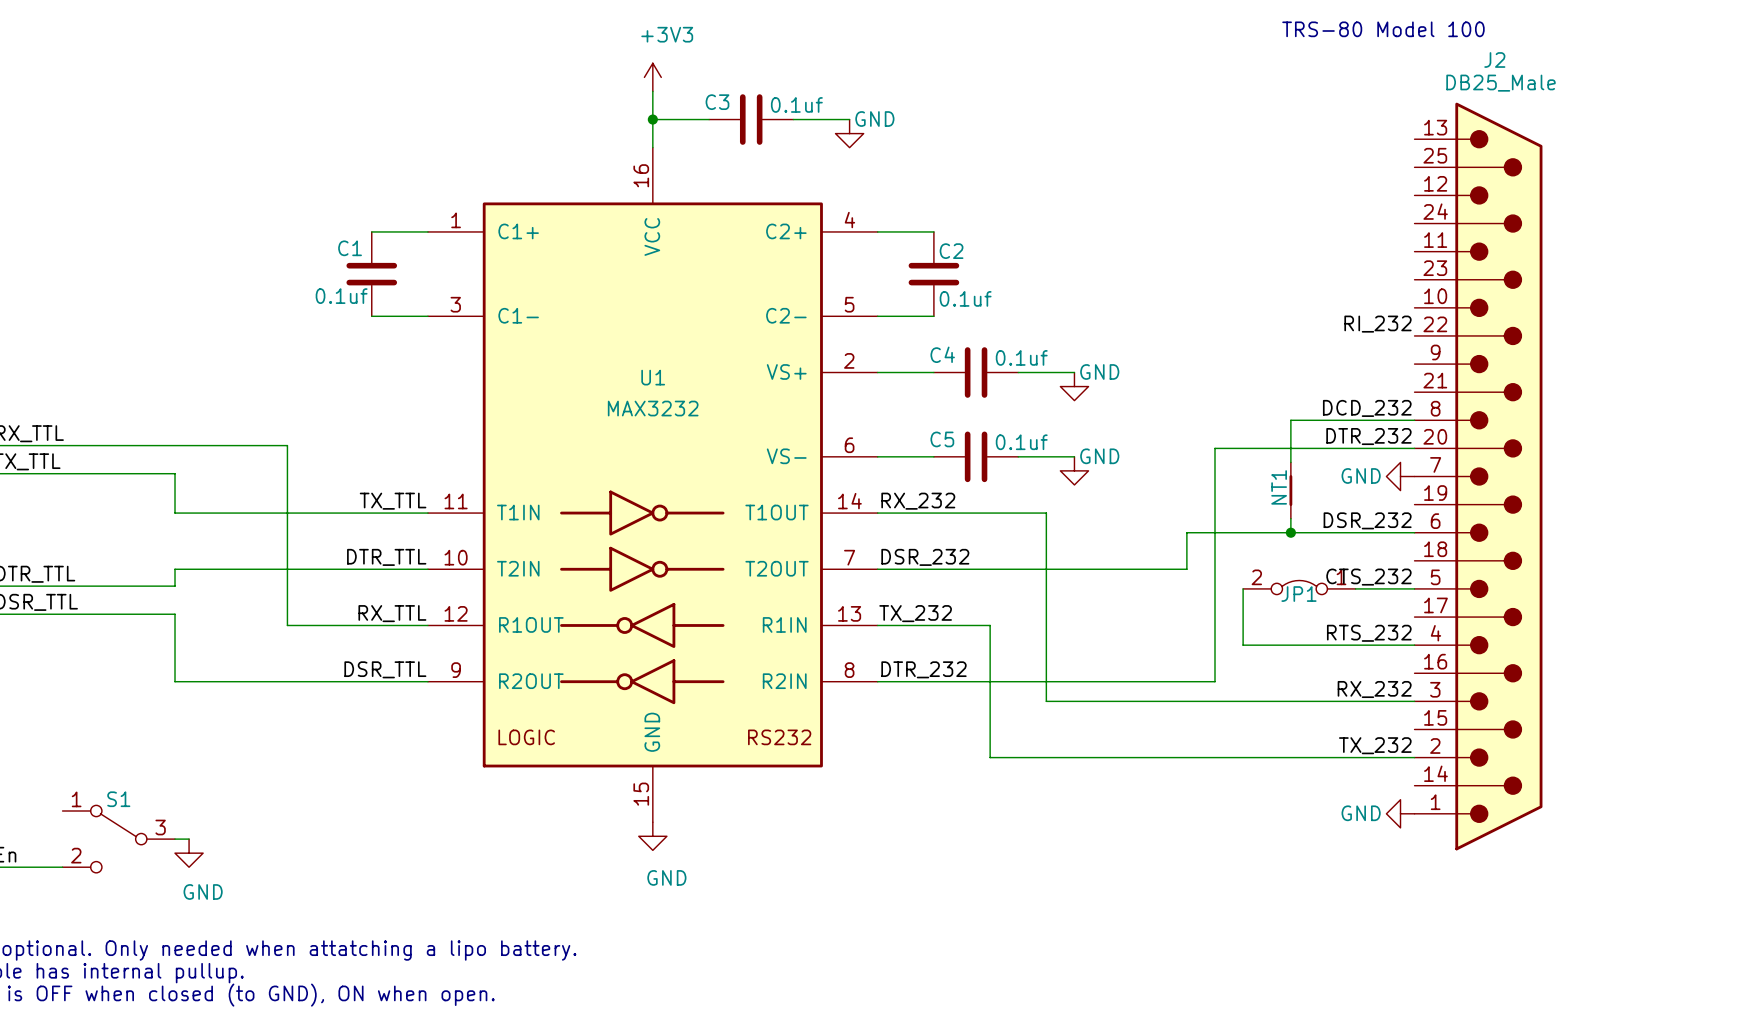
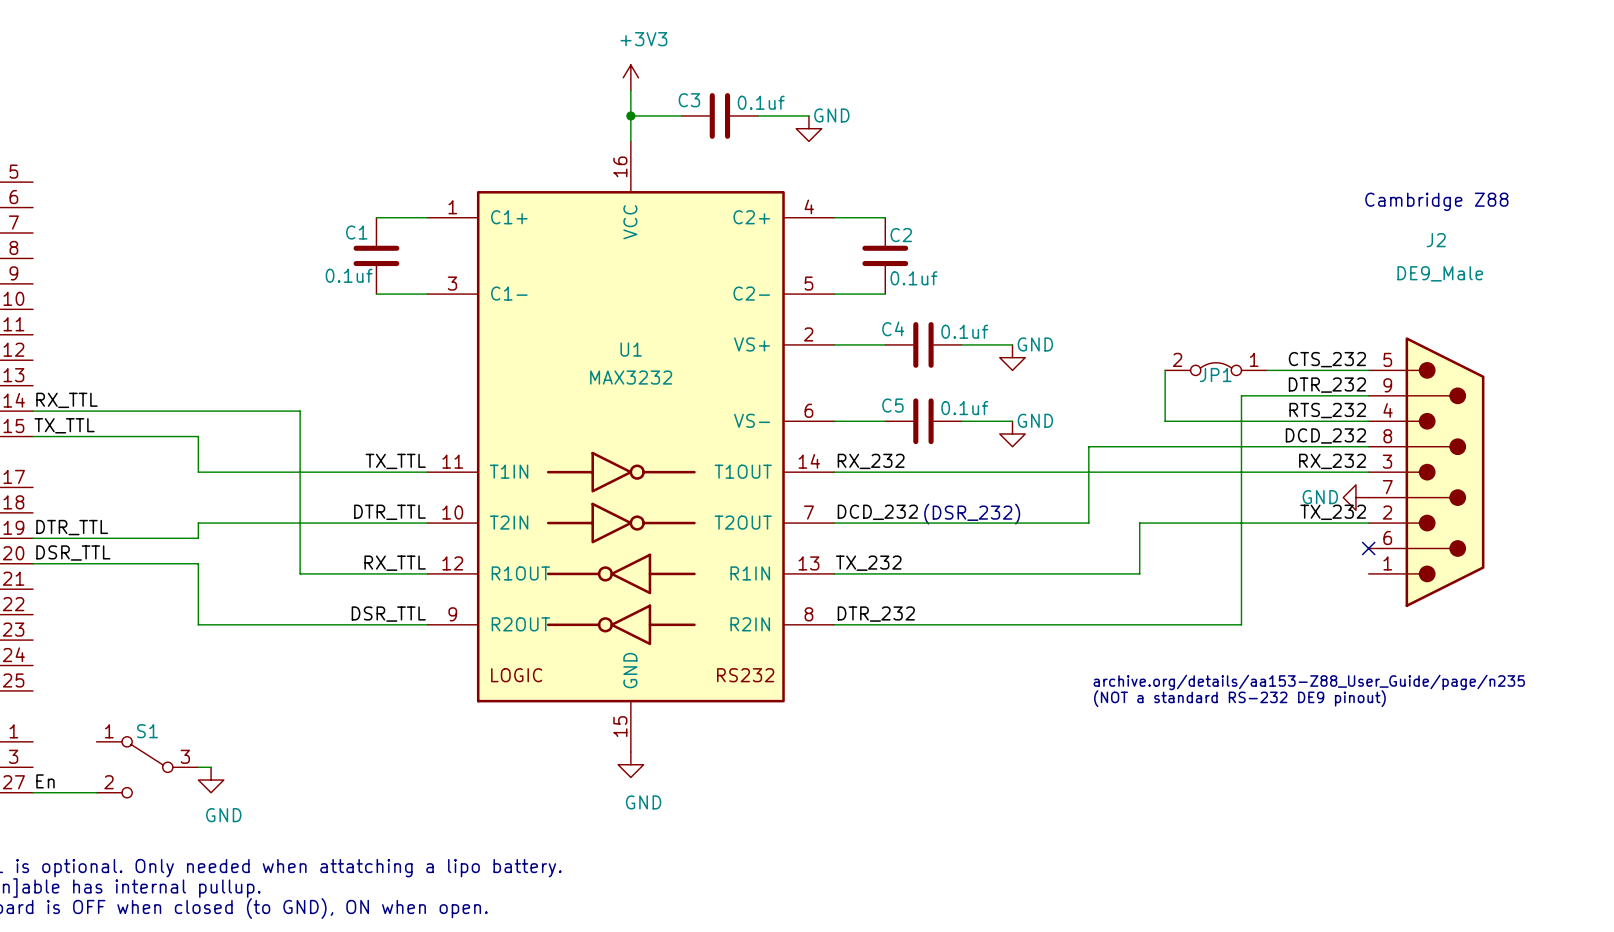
text: TRS-80 Model 100 (1383, 29) -> none
J2 name position: J2 (1494, 59) -> J2 (1436, 240)
J2 value: DB25_Male (1501, 83) -> DE9_Male (1440, 273)
J2 symbol: [1414, 102, 1543, 851] -> [1368, 337, 1485, 608]
text: none -> Cambridge Z88 (1436, 201)
label: RI_232 (1377, 324) -> none
wire: none -> (1165, 370) (1165, 421) (1368, 421)
wire: none -> (1266, 370) (1368, 370)
label position: DCD_232 (1367, 408) -> DCD_232 (1325, 435)
wire: (1414, 420) (1290, 420) (1290, 462) -> none
wire: none -> (1368, 395) (1241, 395) (1241, 624) (1139, 624)
label position: DTR_232 (1368, 436) -> DTR_232 (1327, 385)
wire: (1414, 448) (1214, 448) (1214, 569) -> (1368, 523) (1139, 523)
power symbol position: GND (1400, 476) -> GND (1355, 497)
NT1: (1290, 490) -> none
wire: (1046, 513) (1046, 701) (1414, 701) -> (987, 472) (1368, 472)
wire: (1290, 518) (1290, 532) -> none
label: DSR_232 (1367, 520) -> none
junction: (1290, 532) -> none
wire: (1414, 532) (1186, 532) (1186, 569) (1158, 569) -> (1368, 446) (1088, 446) (1088, 523)
label: DSR_232 (925, 557) -> DCD_232 (877, 512)
text: none -> (DSR_232) (972, 514)
label position: CTS_232 (1368, 577) -> CTS_232 (1327, 359)
JP1 position: (1299, 587) -> (1216, 369)
wire: (1243, 588) (1243, 645) (1414, 645) -> none
wire: (1355, 588) (1414, 588) -> none
no-connect mark: none -> (1368, 548)
wire: (990, 625) (990, 757) (1414, 757) -> none
wire: (1214, 625) (1214, 681) -> (1139, 573) (936, 573)
label position: RTS_232 (1369, 633) -> RTS_232 (1327, 410)
label position: RX_232 (1374, 689) -> RX_232 (1332, 461)
label position: TX_232 (1375, 745) -> TX_232 (1333, 512)
text: none -> archive.org/details/aa153-Z88_User_Guide/page/n235 (1309, 682)
text: none -> (NOT a standard RS-232 DE9 pinout) (1239, 698)
power symbol: GND (1400, 813) -> none

